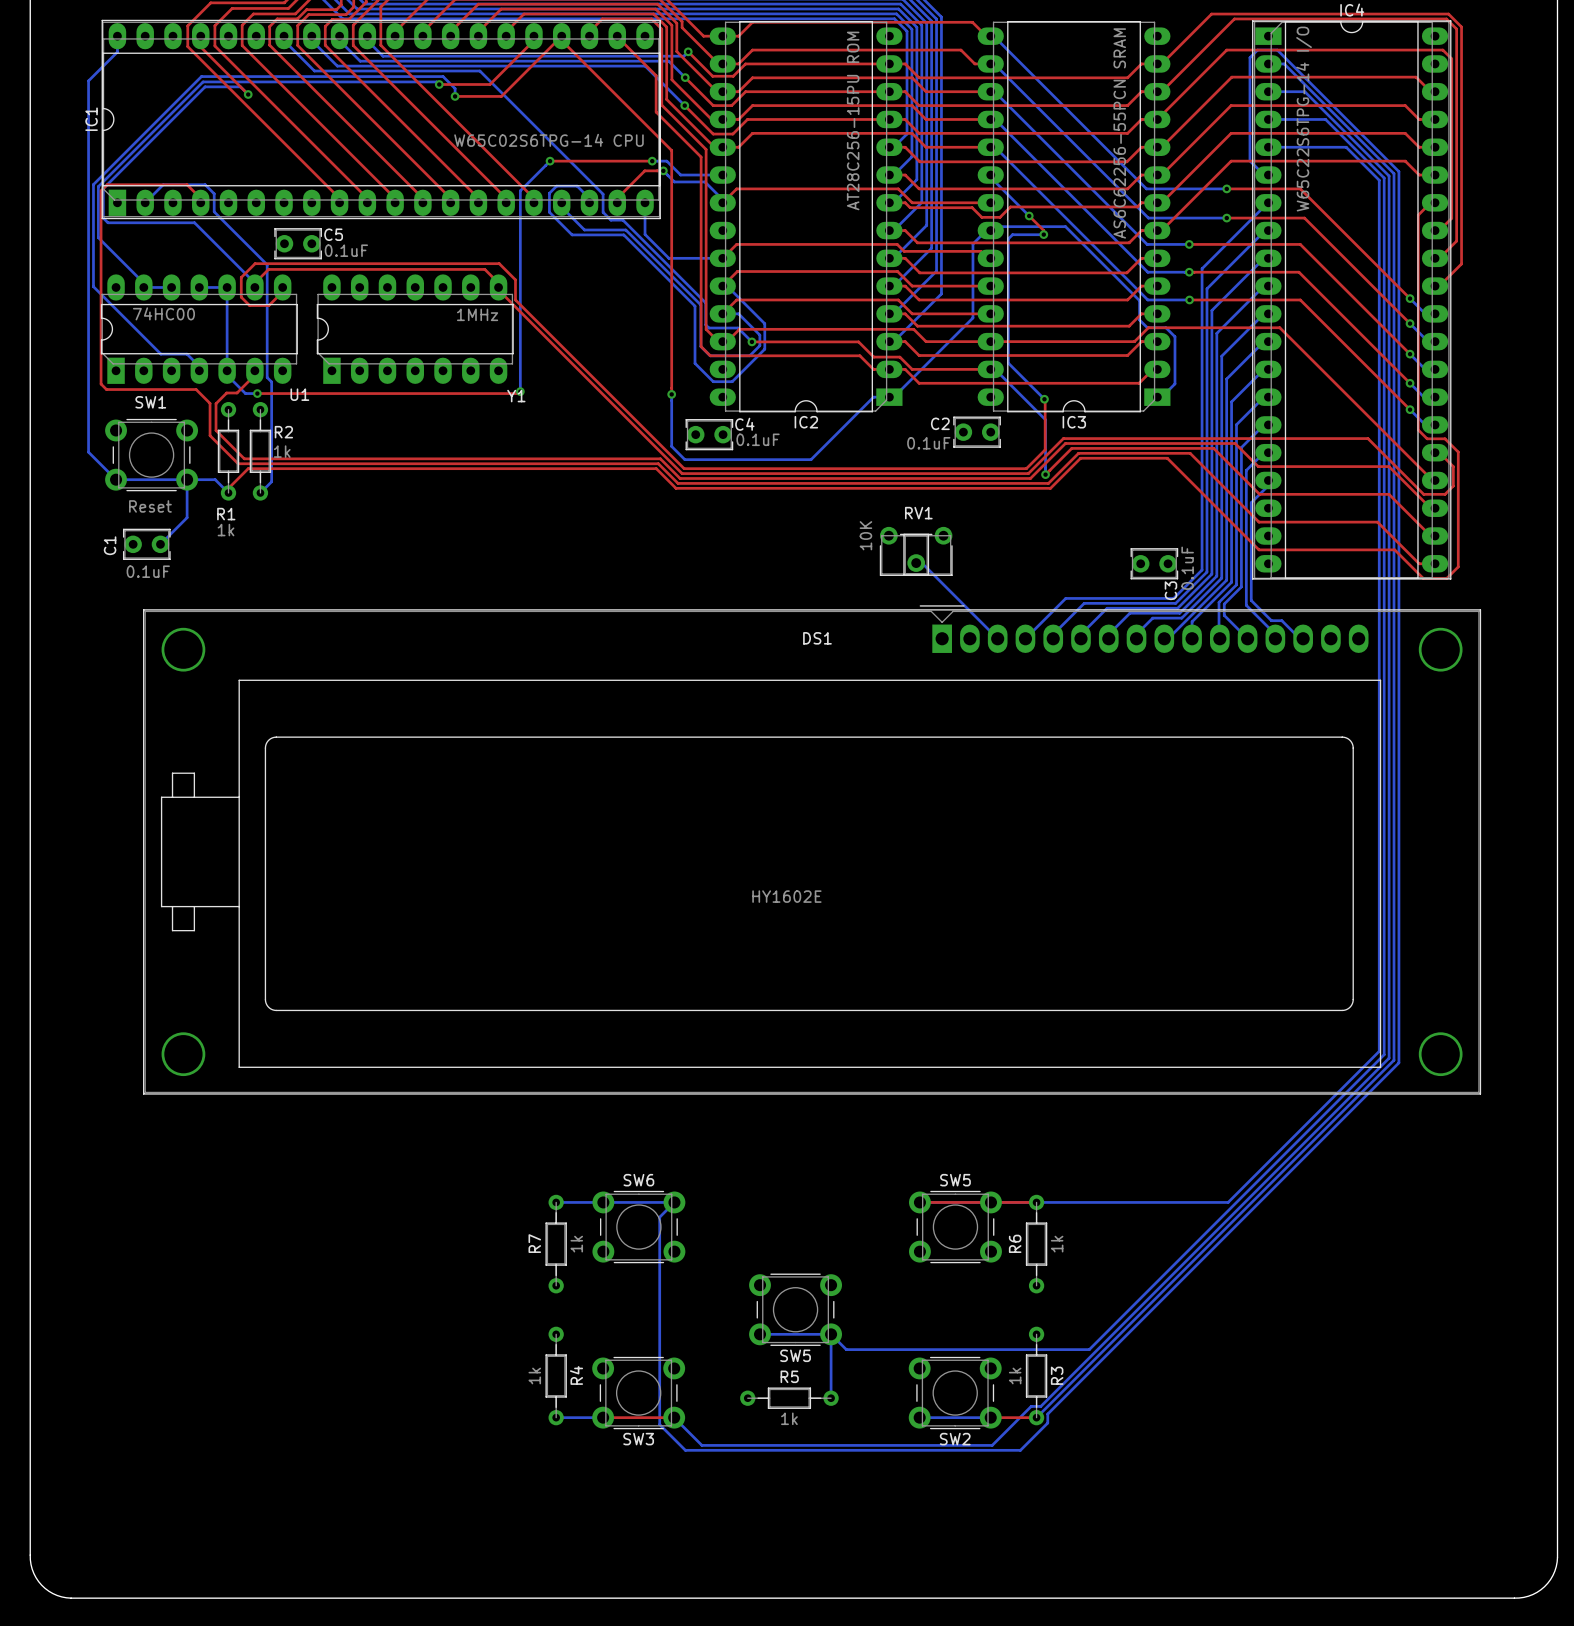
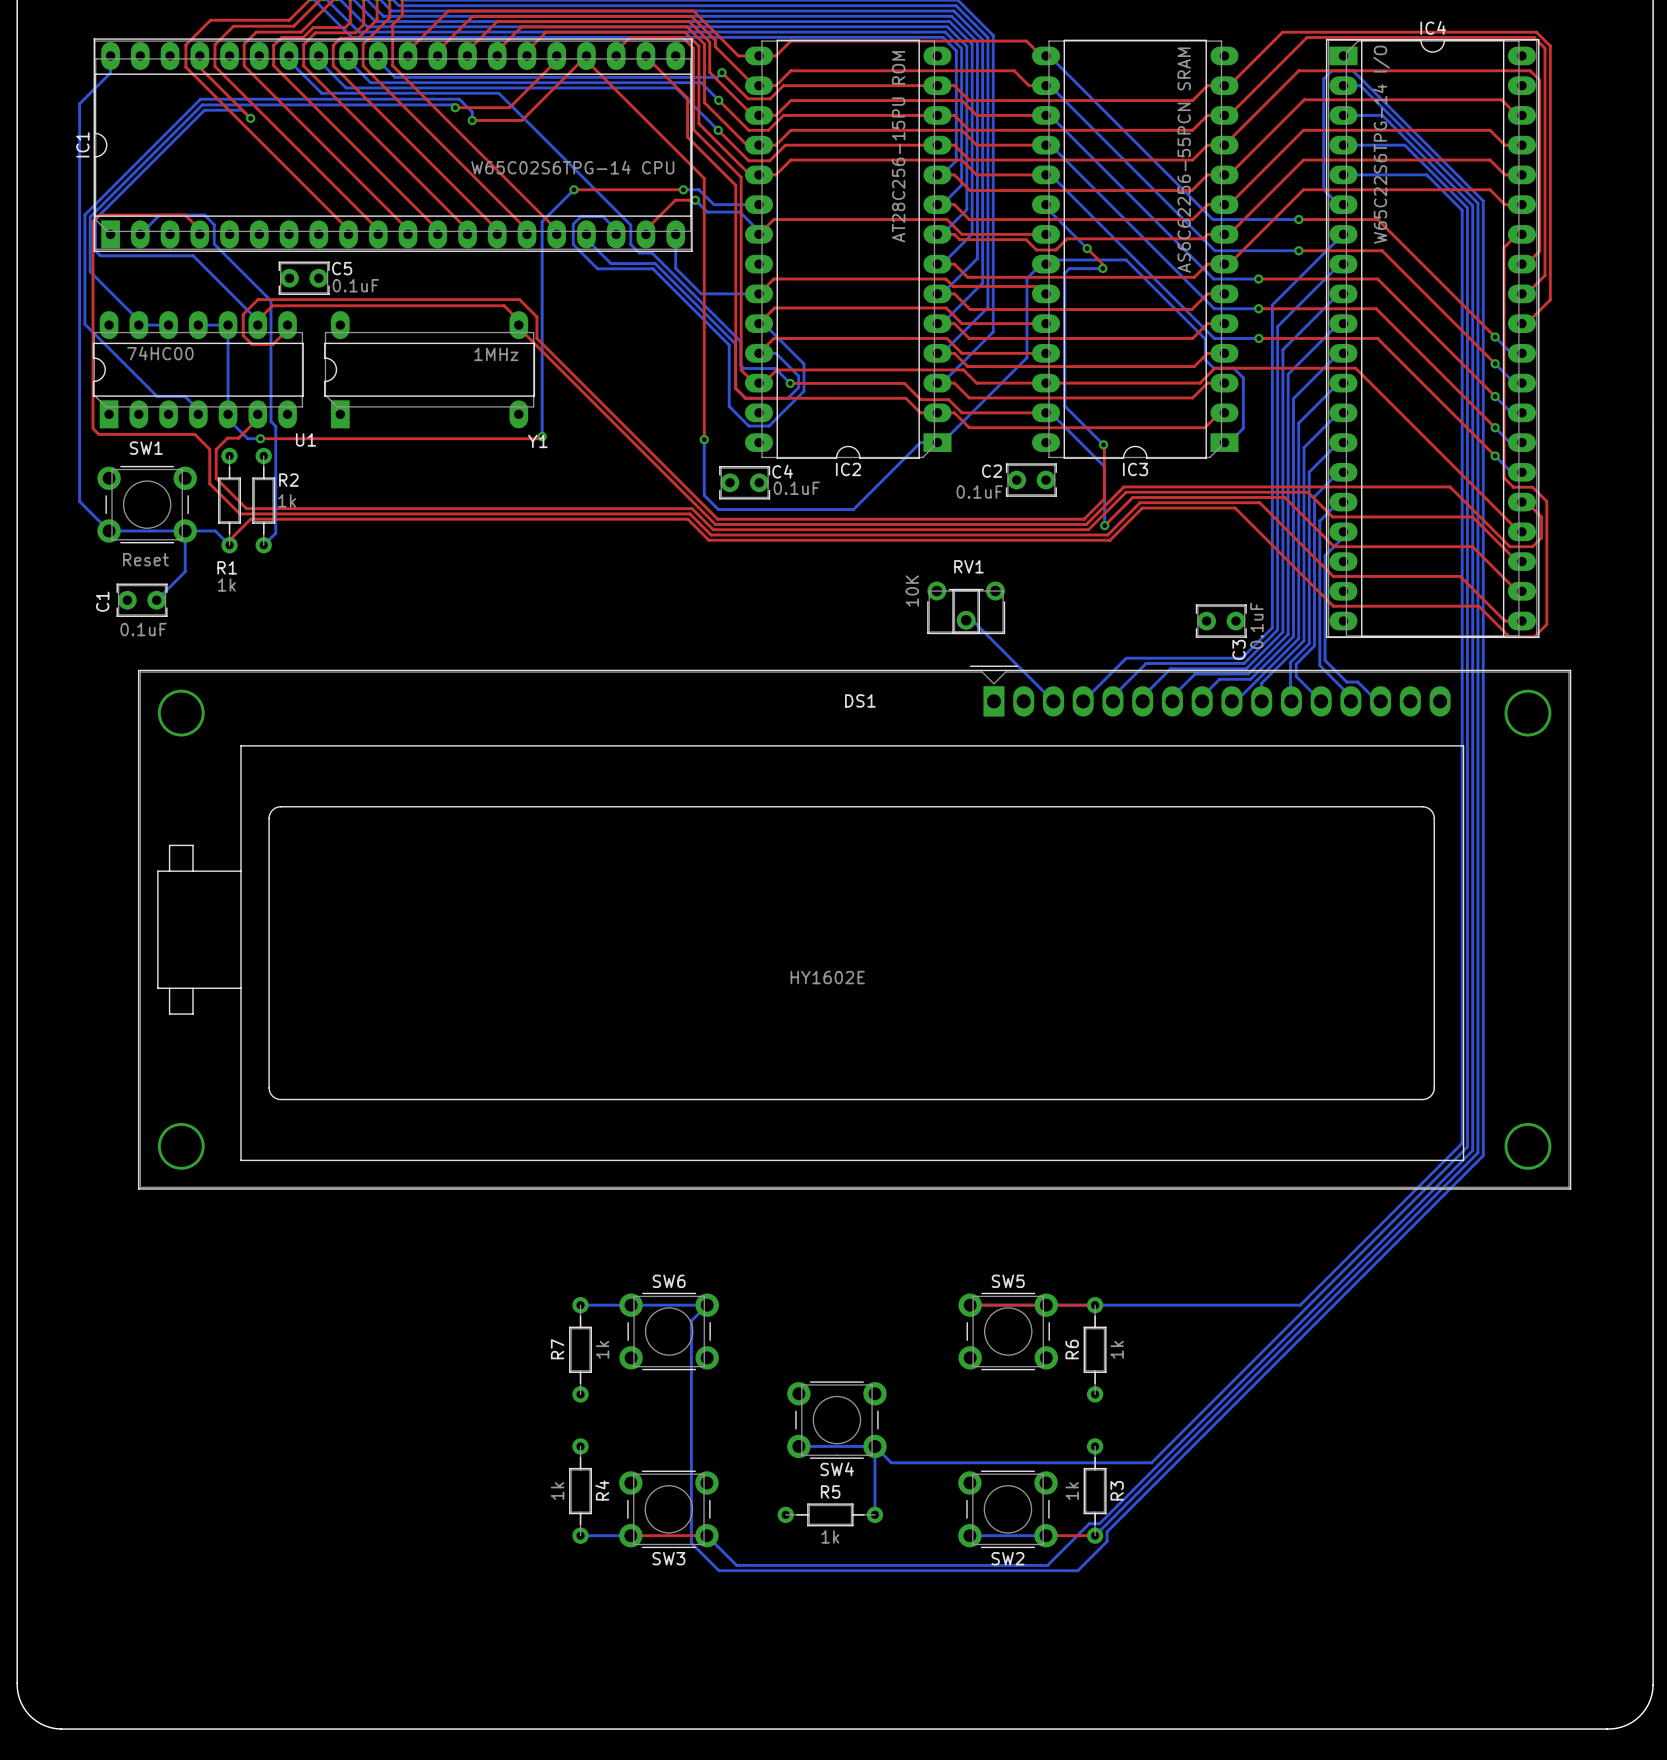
Y1 footprint: [316, 274, 514, 384] -> [324, 311, 536, 429]
SW5 name: SW5 (795, 1355) -> SW4 (837, 1469)

